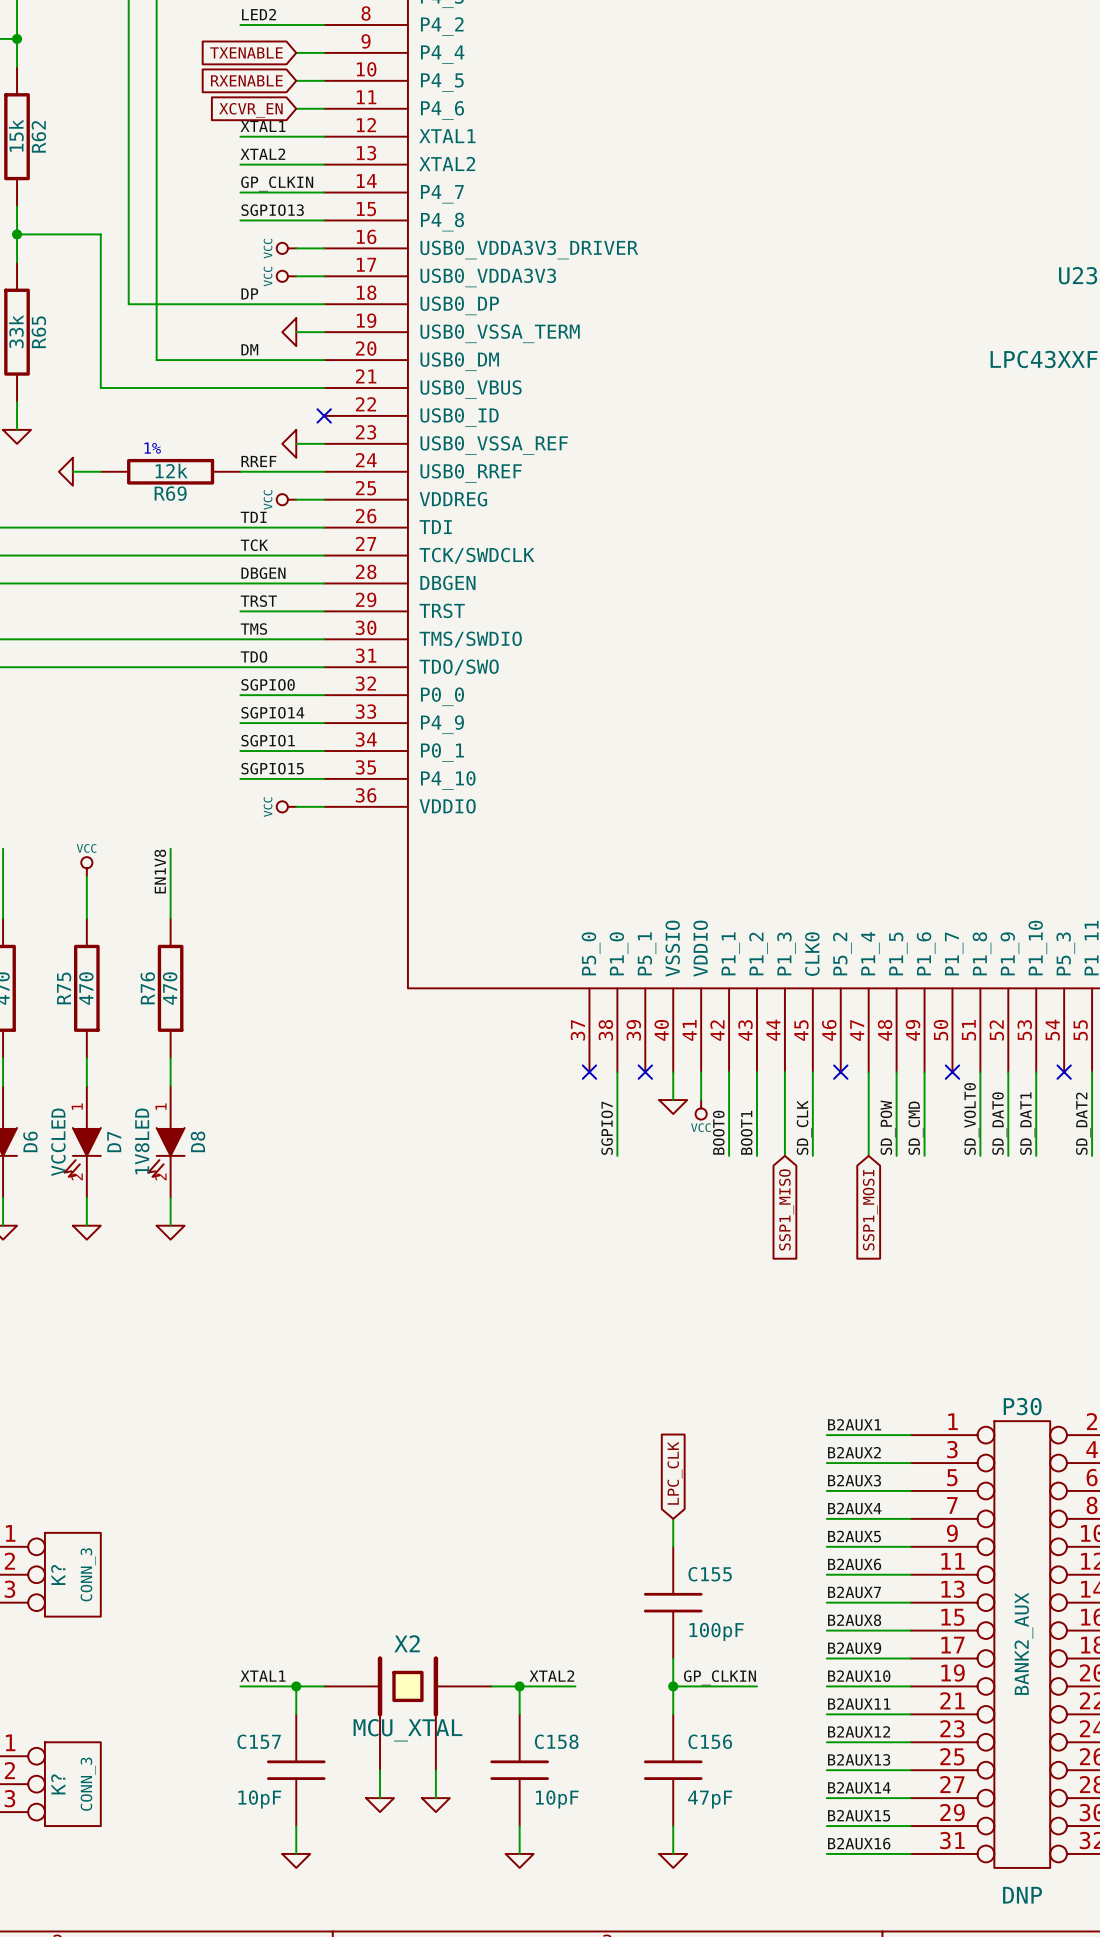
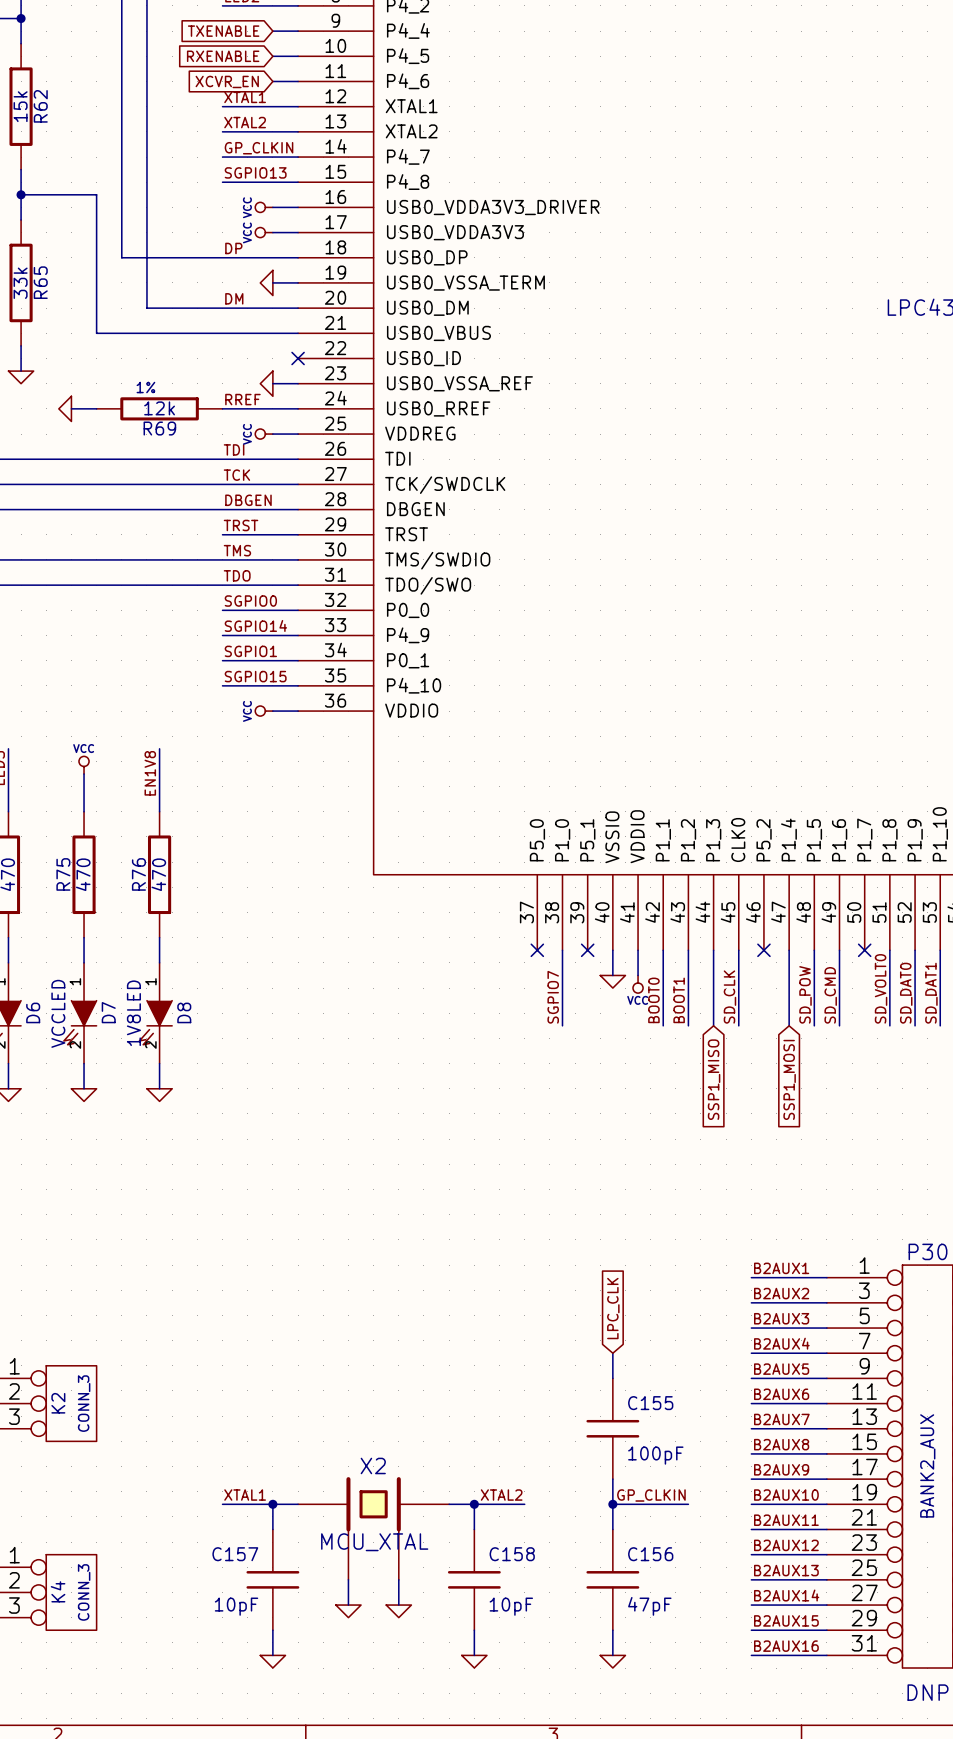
K? name: K? (58, 1575) -> K2 (58, 1403)
K? name: K? (58, 1784) -> K4 (58, 1591)

